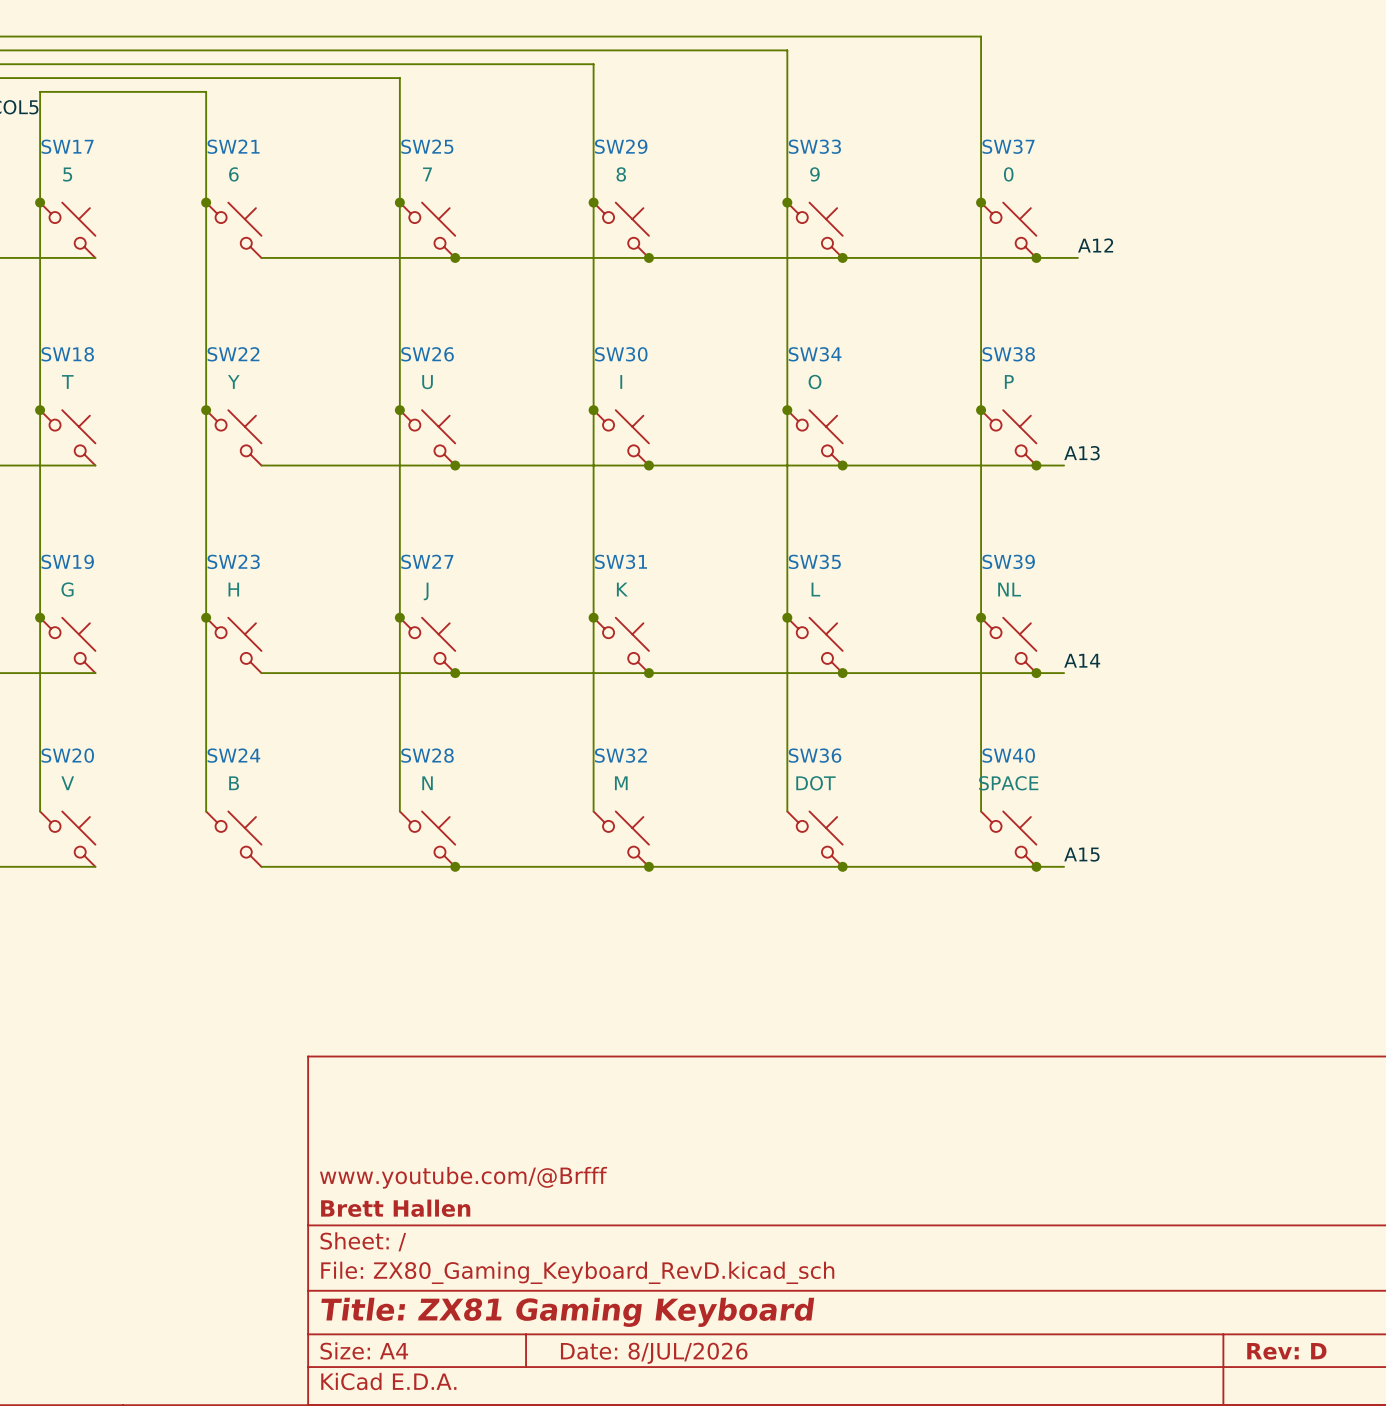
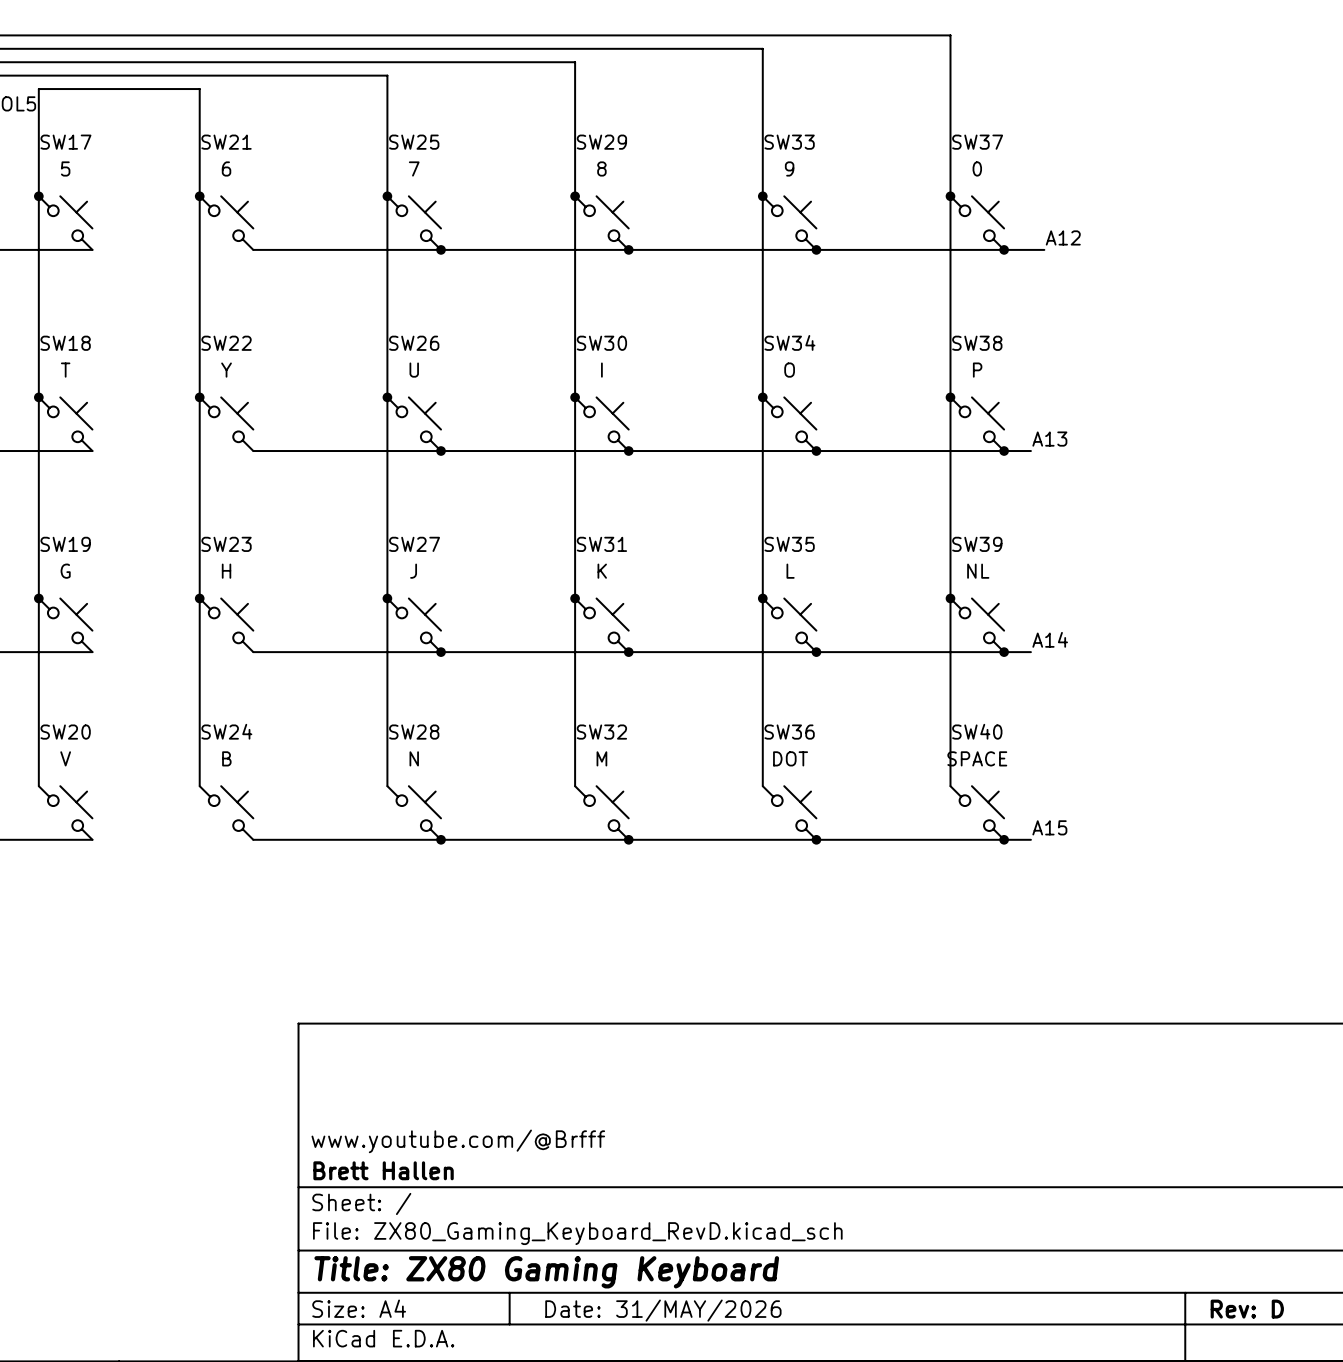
title block: Title: ZX81 Gaming Keyboard (567, 1312) -> Title: ZX80 Gaming Keyboard (546, 1272)
title block: Date: 8/JUL/2026 (654, 1353) -> Date: 31/MAY/2026 (663, 1310)

